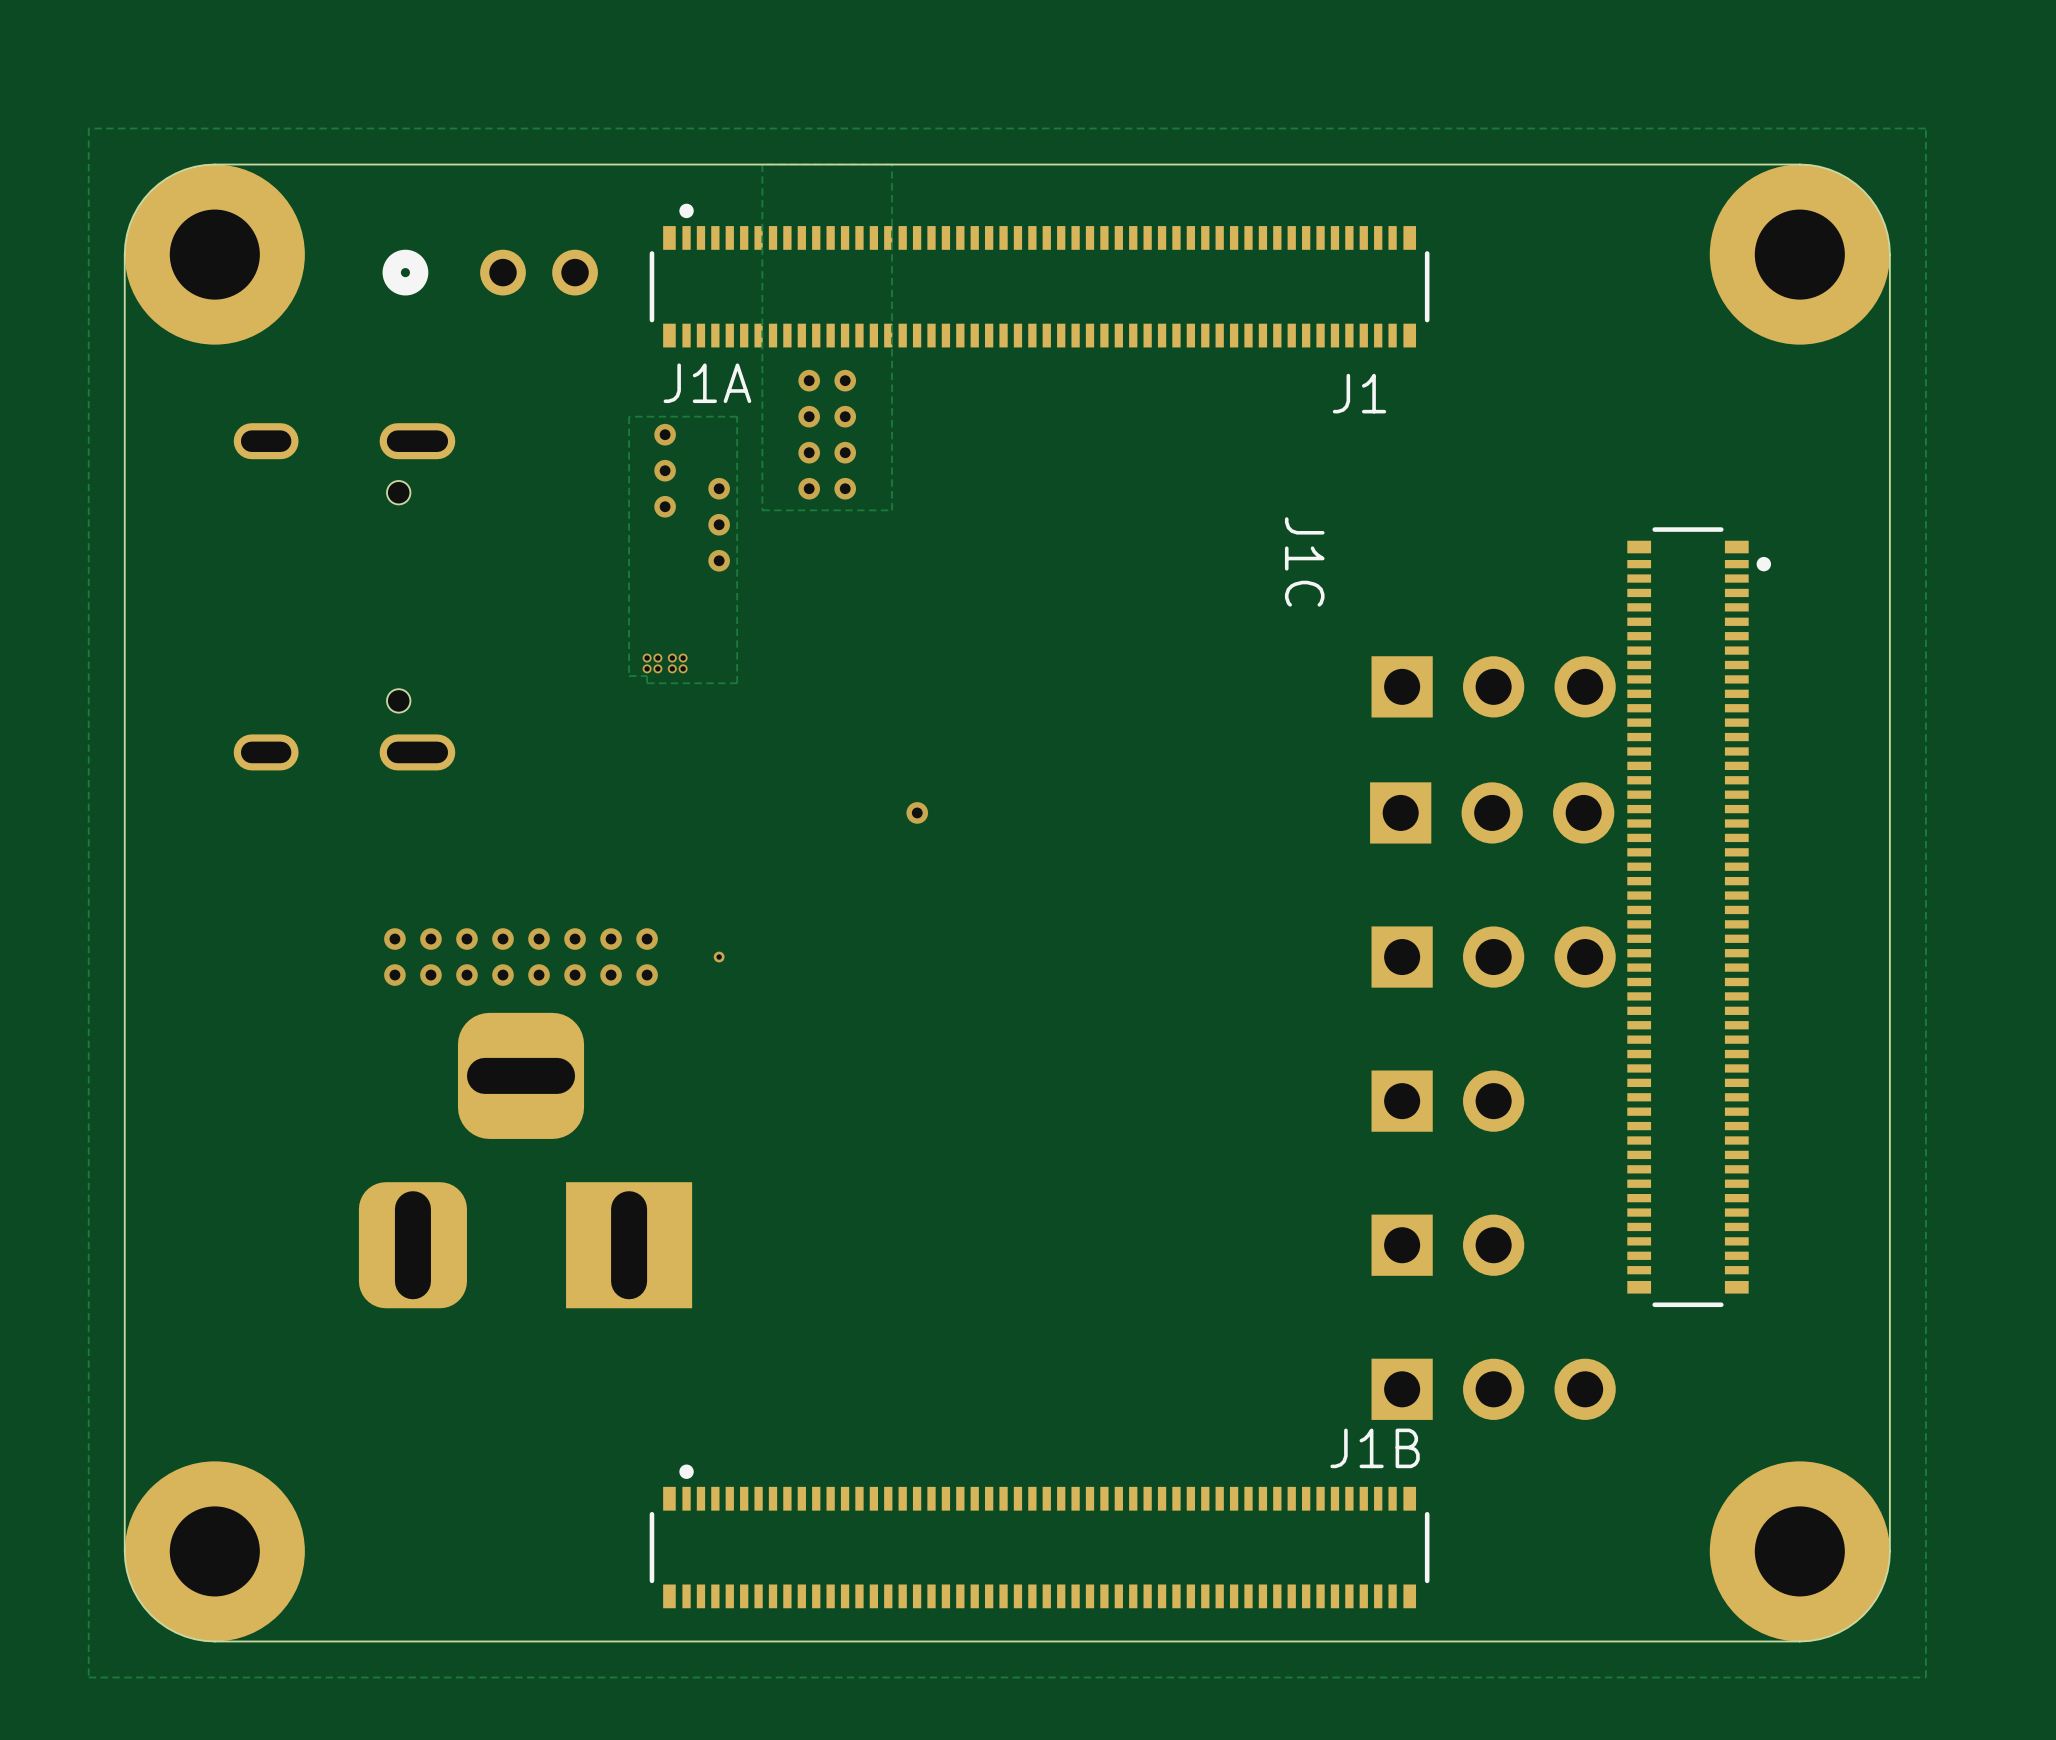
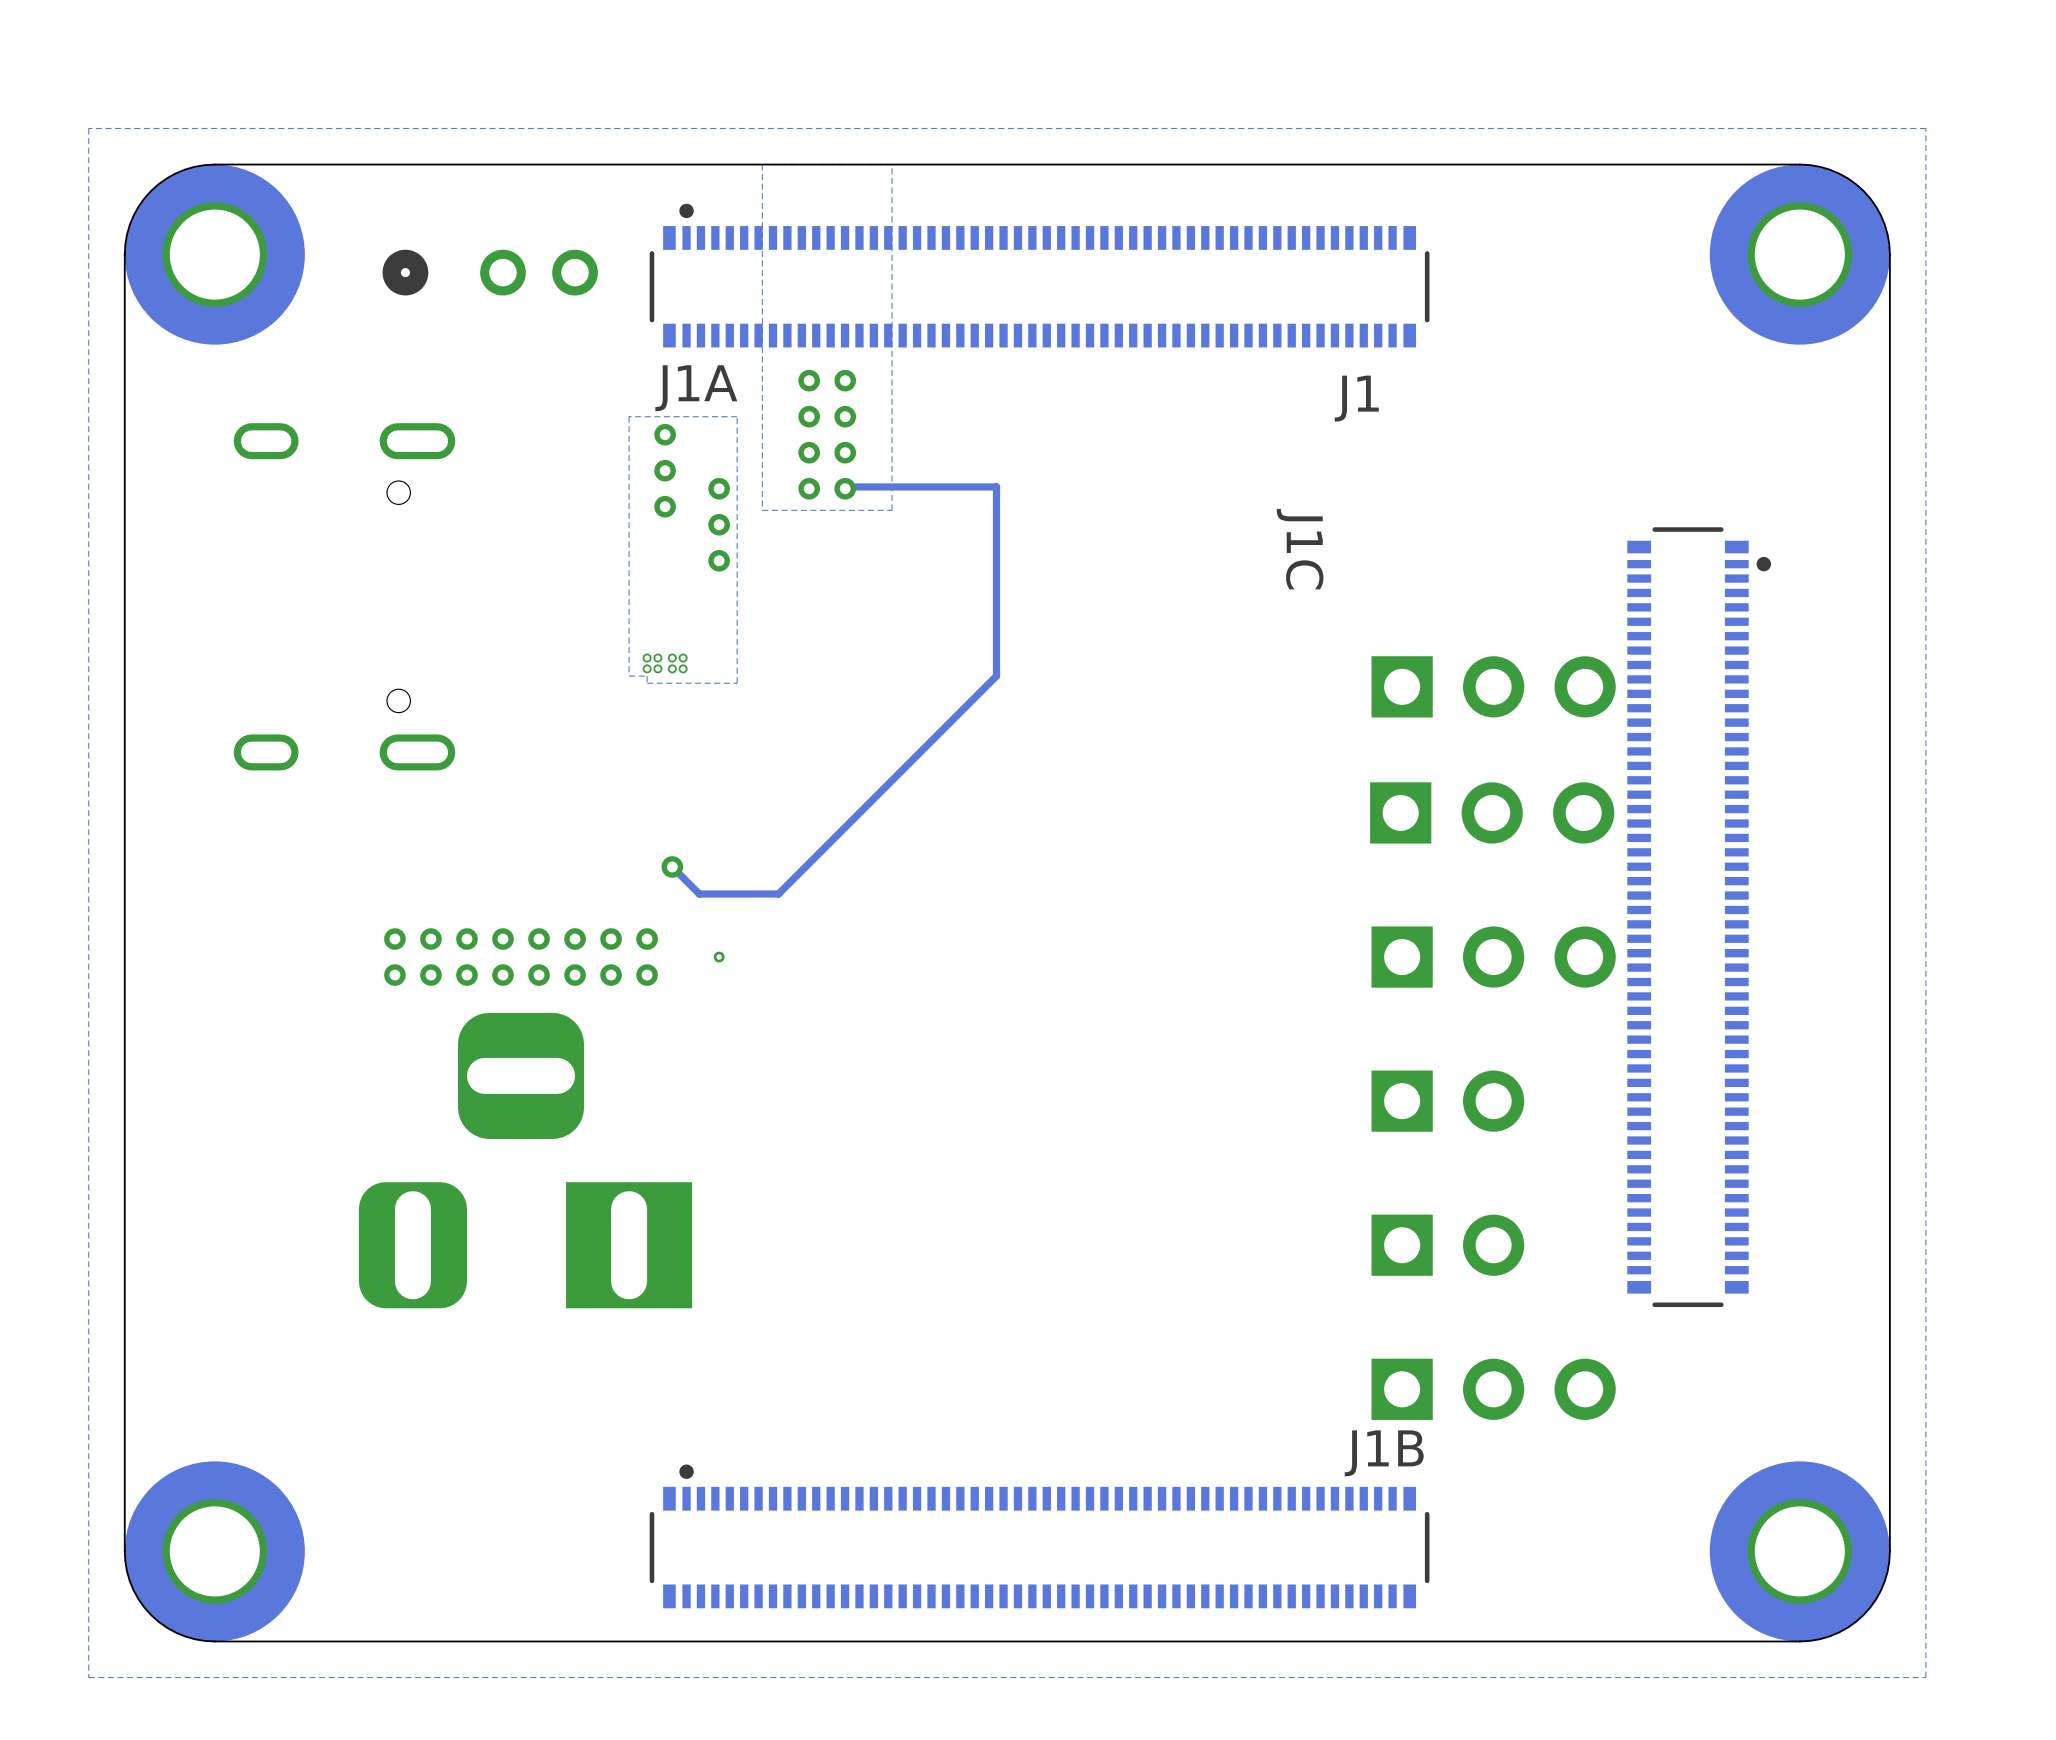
track: none -> (845, 488) (847, 486) (996, 486) (996, 676) (778, 893) (699, 893) (672, 866)
via: (917, 812) -> none
via: none -> (672, 866)

